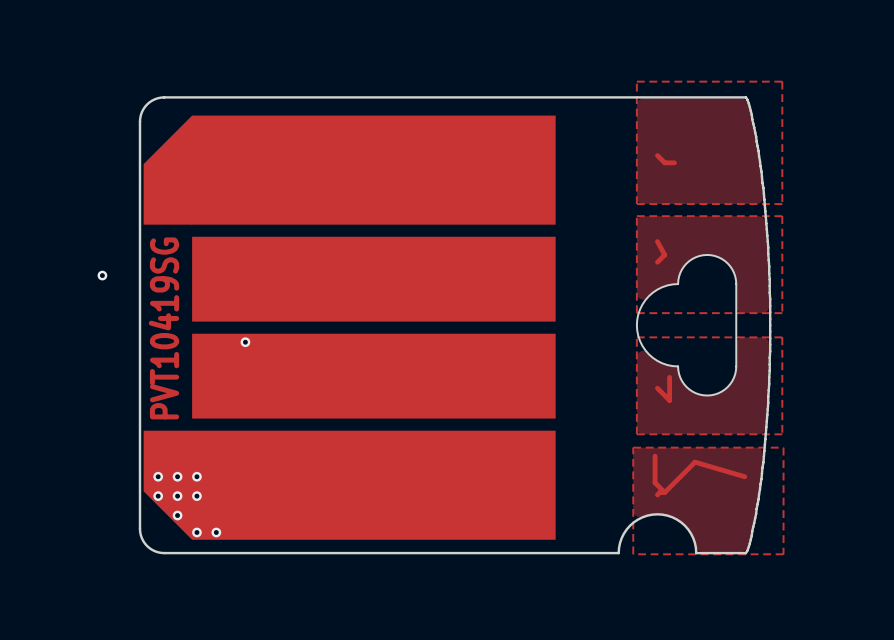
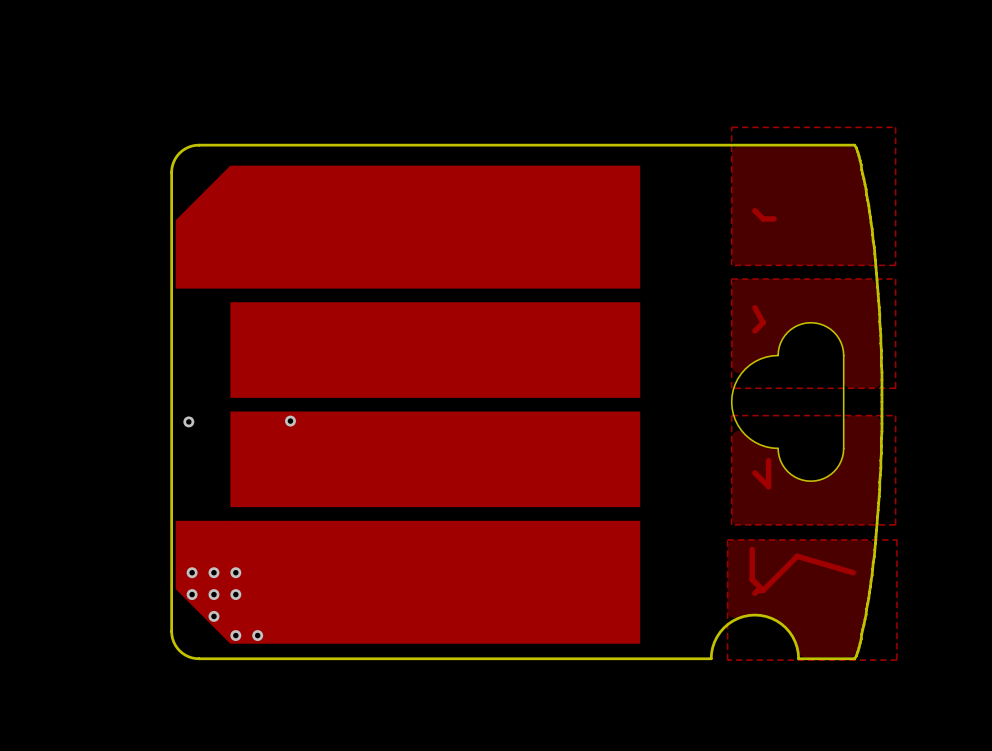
via position: (102, 275) -> (188, 421)
text: PVT10419SG (163, 328) -> none

